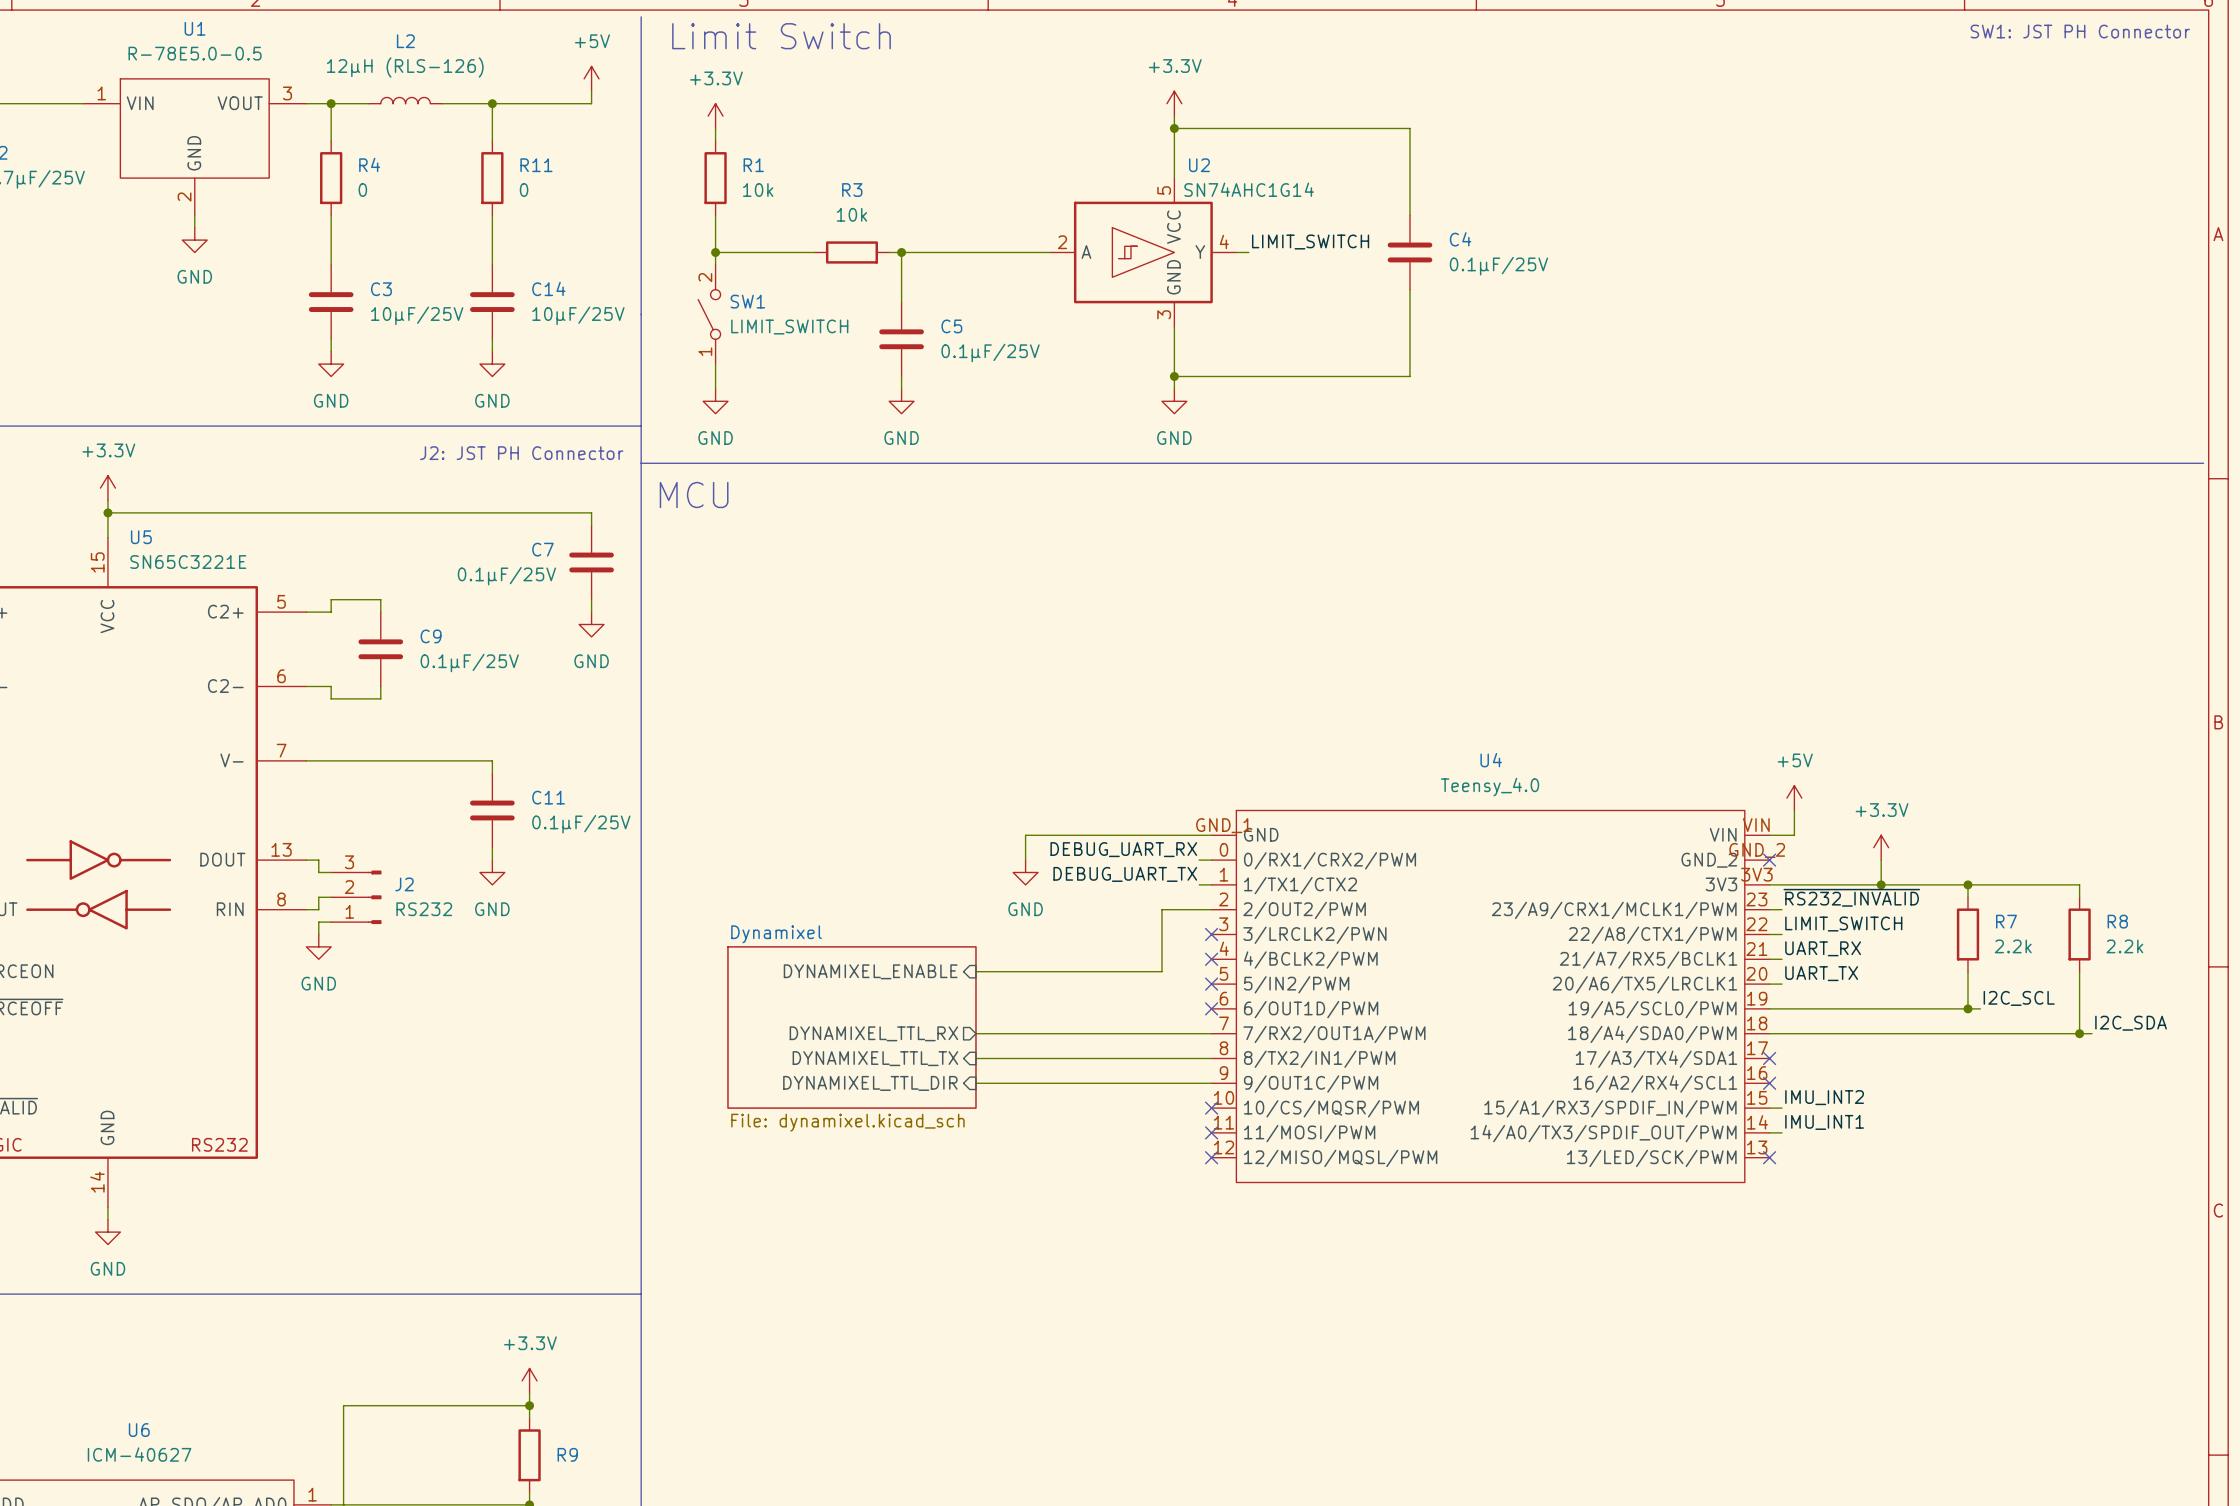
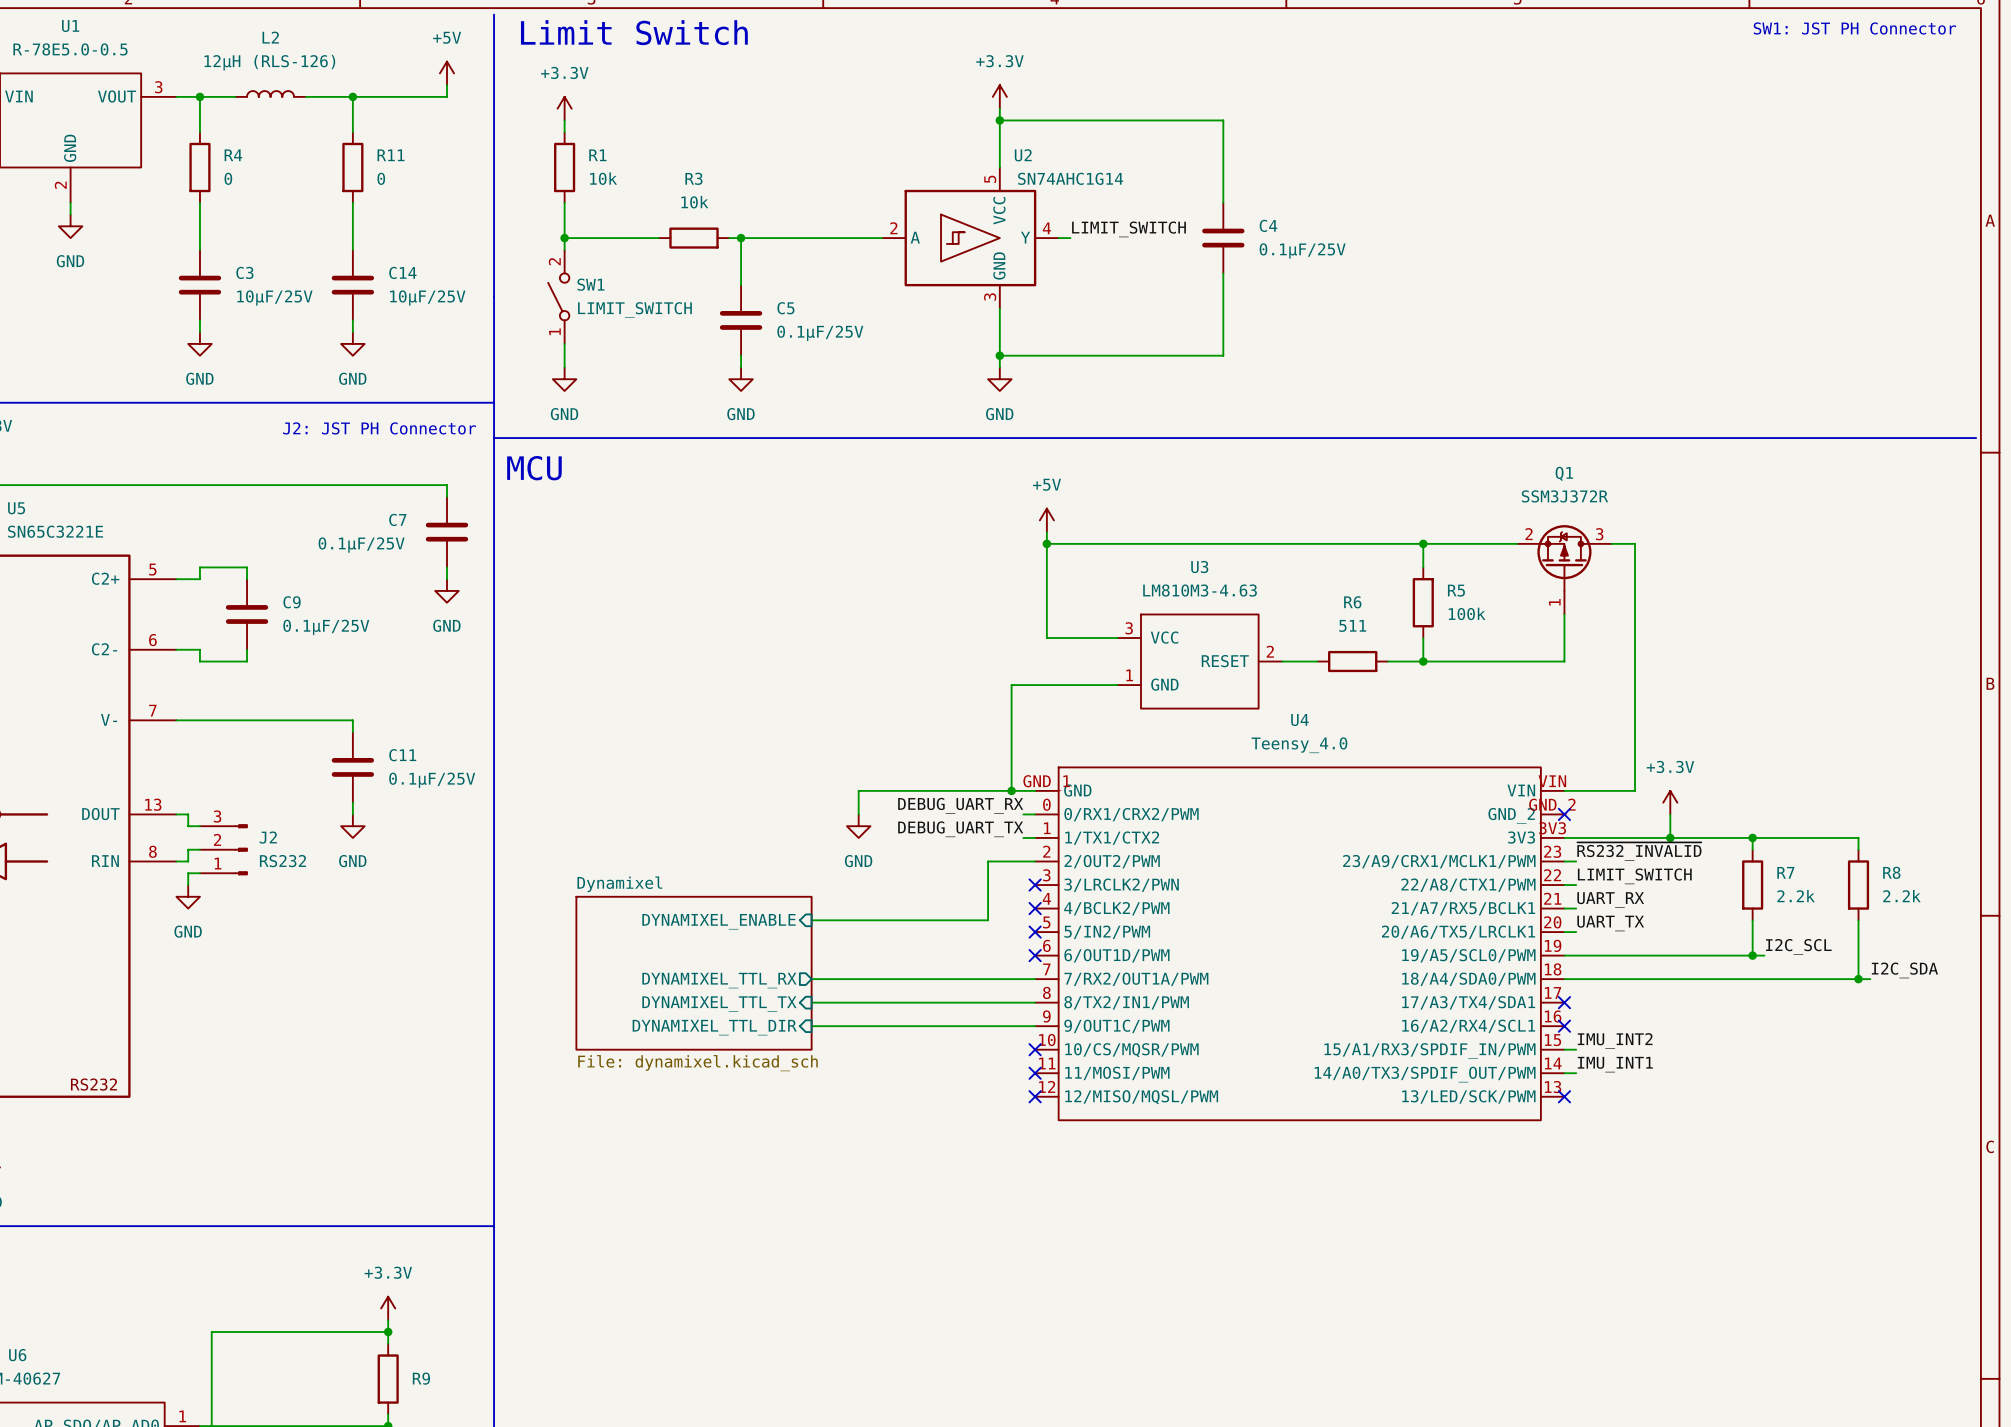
power symbol: none -> +5V (1046, 520)
wire: none -> (1046, 532) (1046, 638) (1117, 638)
wire: none -> (1046, 543) (1517, 543)
junction: none -> (1046, 543)
wire: none -> (1423, 543) (1423, 567)
junction: none -> (1423, 543)
Q1: none -> SSM3J372R (1564, 569)
R5: none -> 100k (1423, 602)
wire: none -> (1564, 614) (1564, 661) (1388, 661)
wire: none -> (1423, 638) (1423, 661)
U3: none -> LM810M3-4.63 (1199, 661)
wire: none -> (1282, 661) (1317, 661)
R6: none -> 511 (1352, 661)
junction: none -> (1423, 661)
wire: none -> (1117, 685) (1011, 685) (1011, 790)
power symbol: +5V (1794, 798) -> none
wire: (1794, 810) (1794, 835) -> (1611, 543) (1635, 543) (1635, 790) (1587, 790)
junction: none -> (1011, 790)

